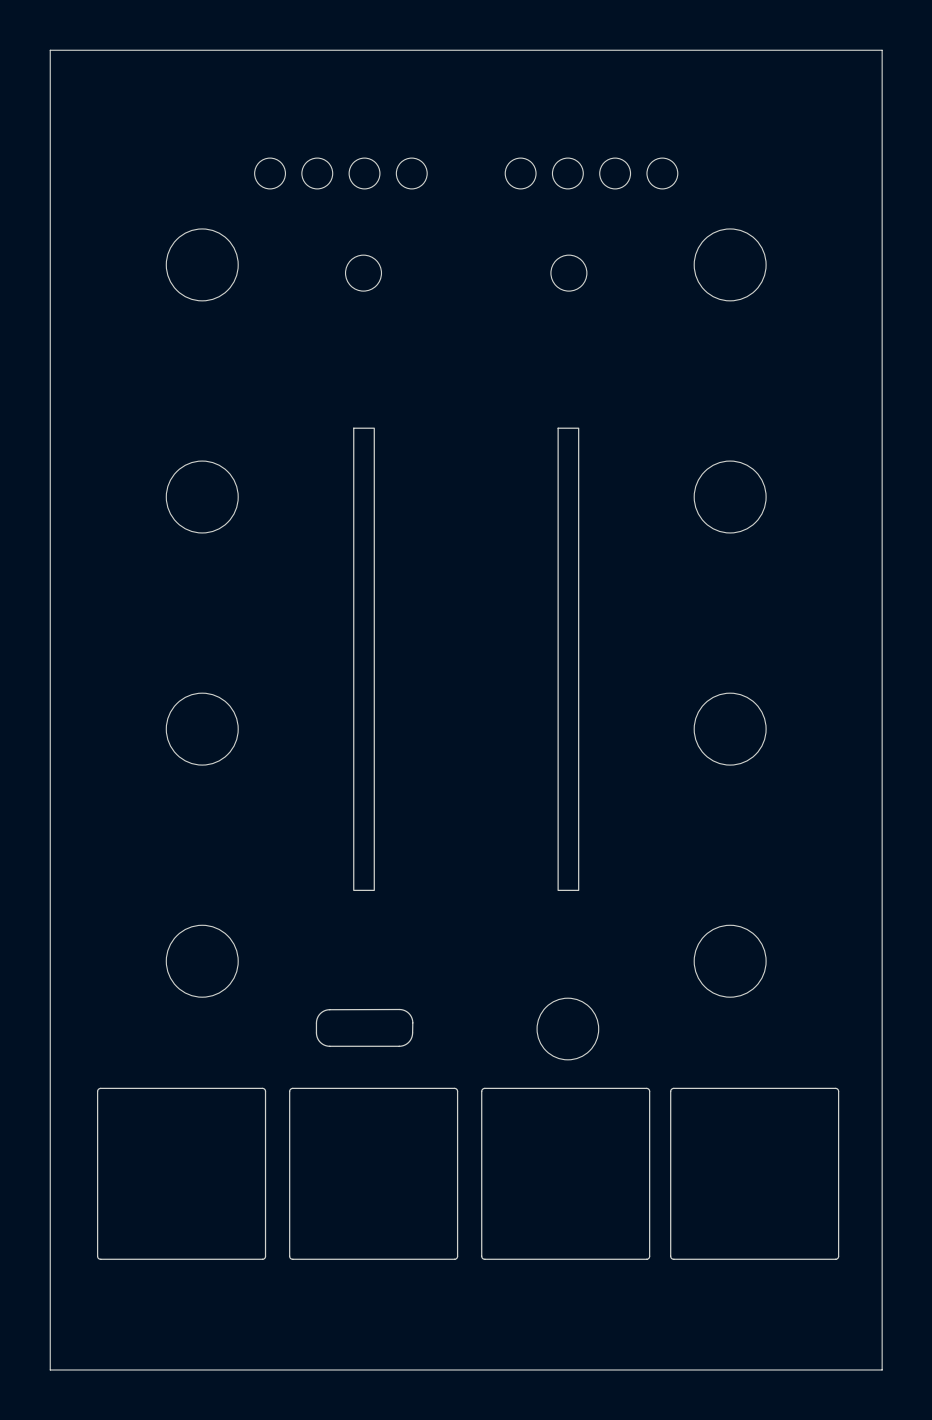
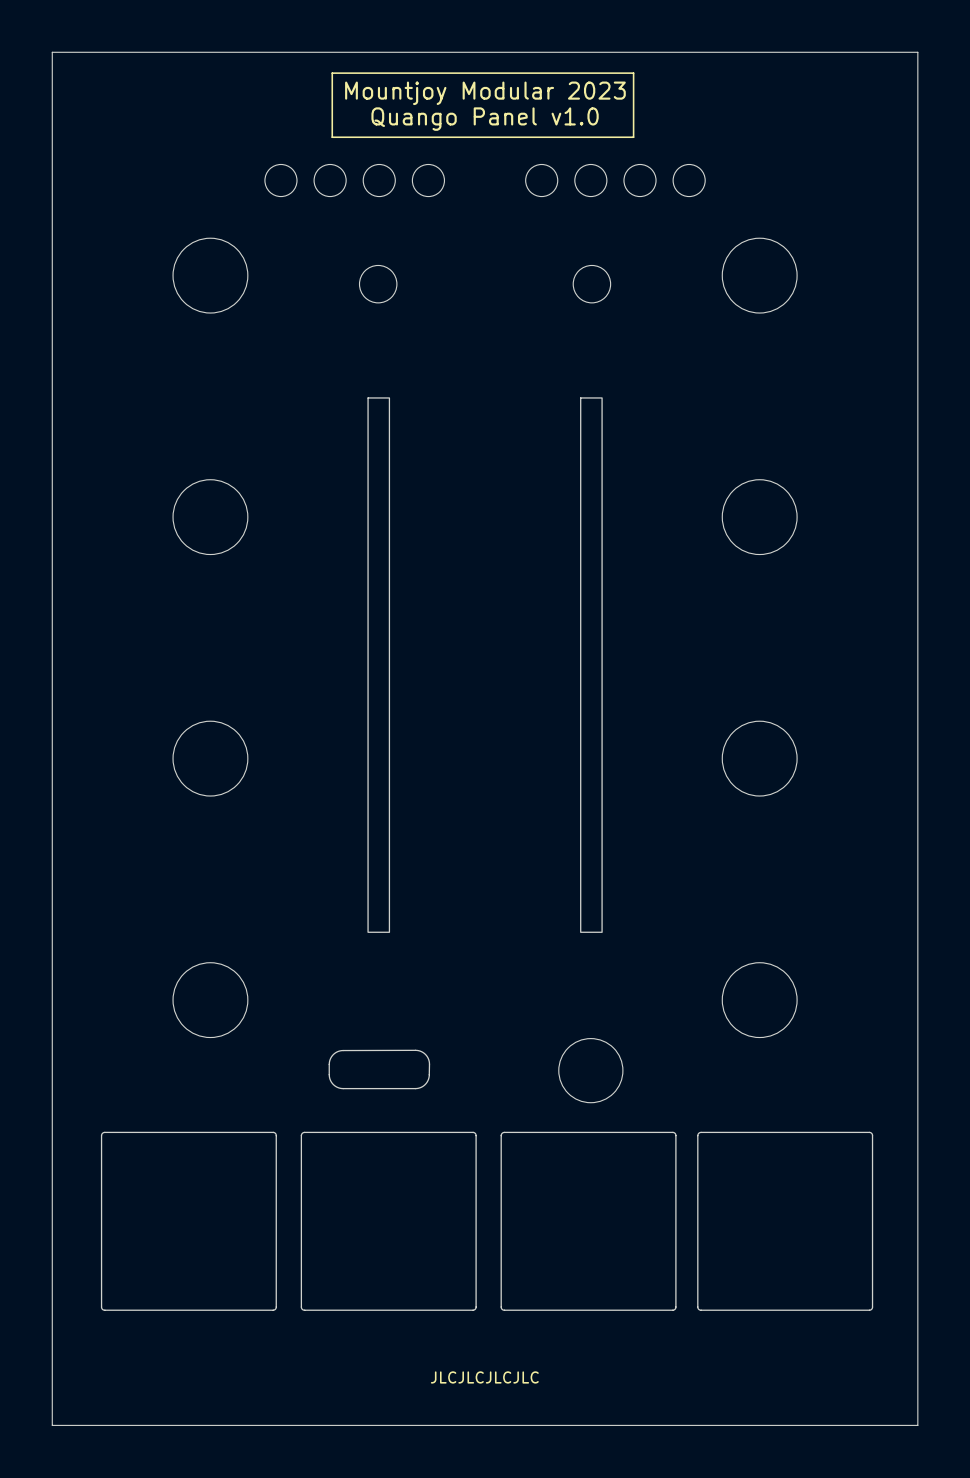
line: none -> (633, 73) (633, 137) (332, 137) (332, 73) (633, 73)
text: none -> Mountjoy Modular 2023 (485, 93)
text: none -> Quango Panel v1.0 (485, 119)
drawing: none -> [367, 397, 391, 933]
drawing: none -> [580, 397, 603, 933]
drawing: [353, 427, 375, 891] -> none
drawing: [557, 427, 580, 891] -> none
text: none -> JLCJLCJLCJLC (484, 1377)

